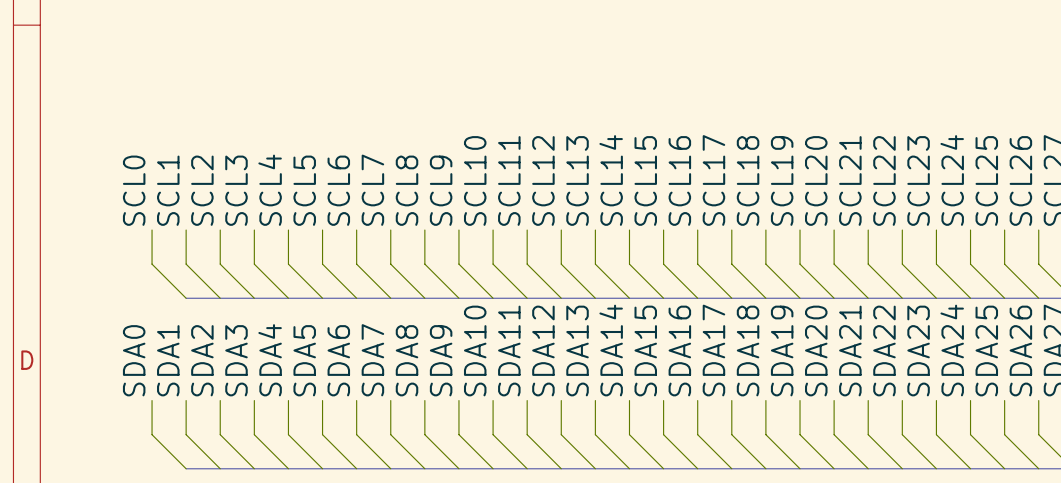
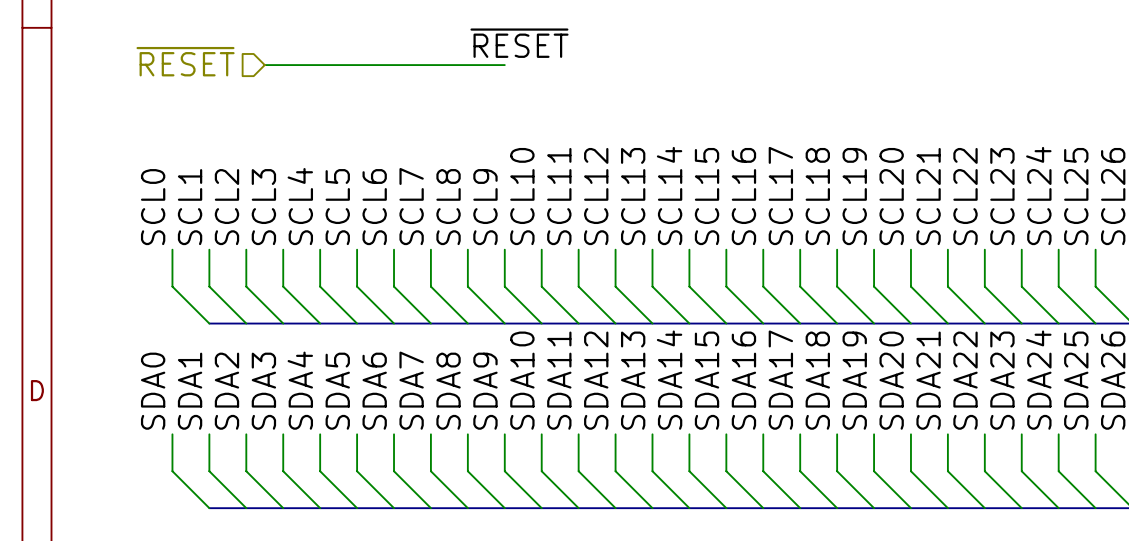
label: none -> ~{RESET} (519, 43)
hierarchical label: none -> ~{RESET} (185, 61)
wire: none -> (264, 65) (504, 65)

